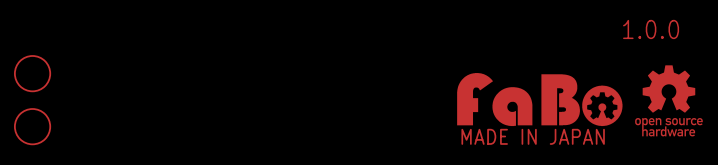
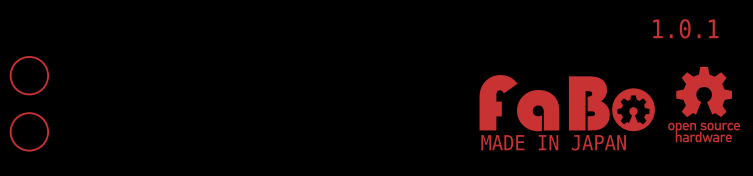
text: 1.0.0 (651, 29) -> 1.0.1 (685, 28)

